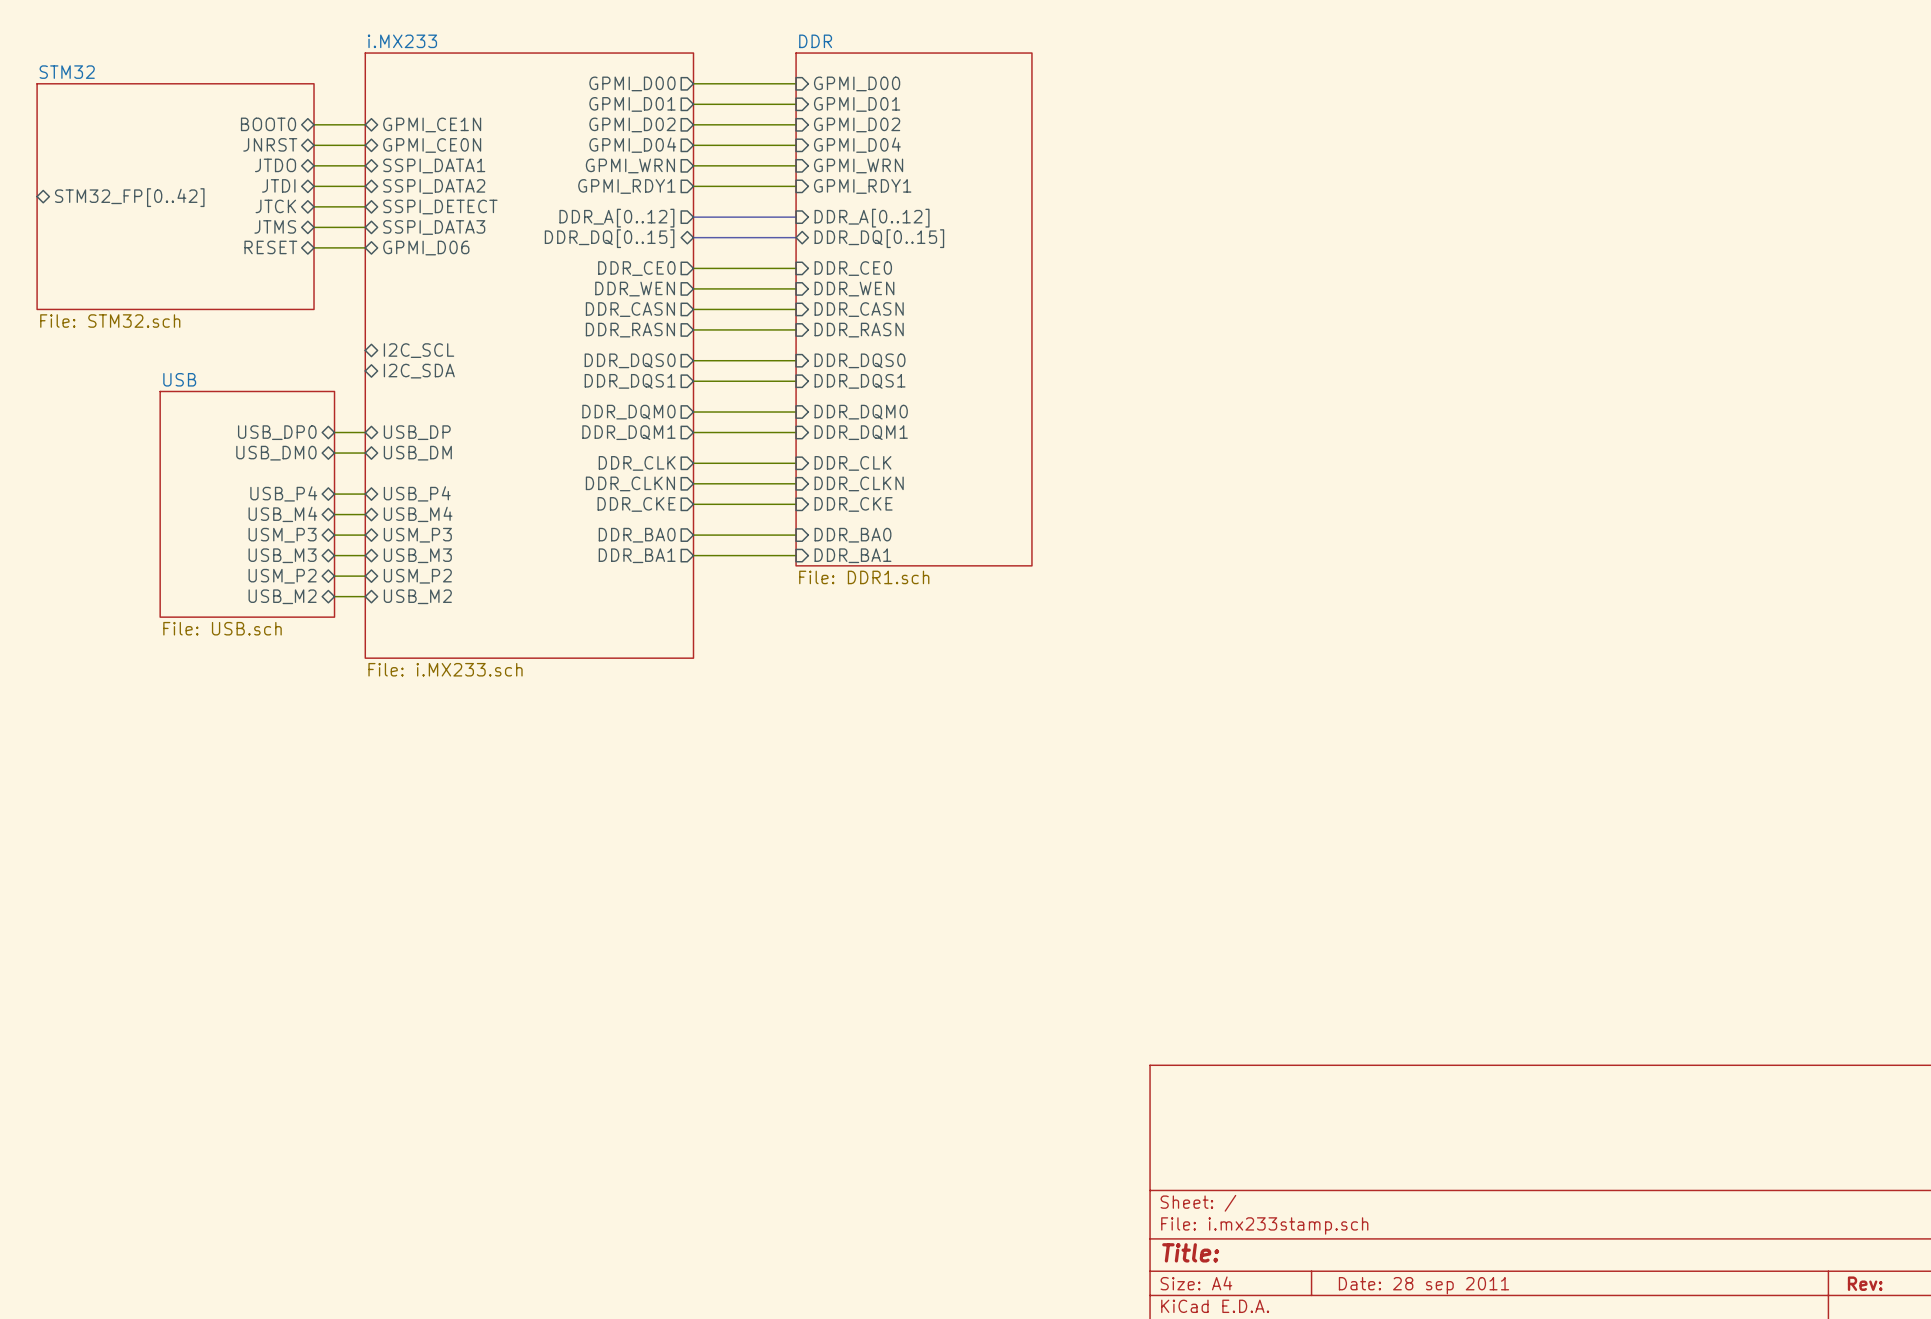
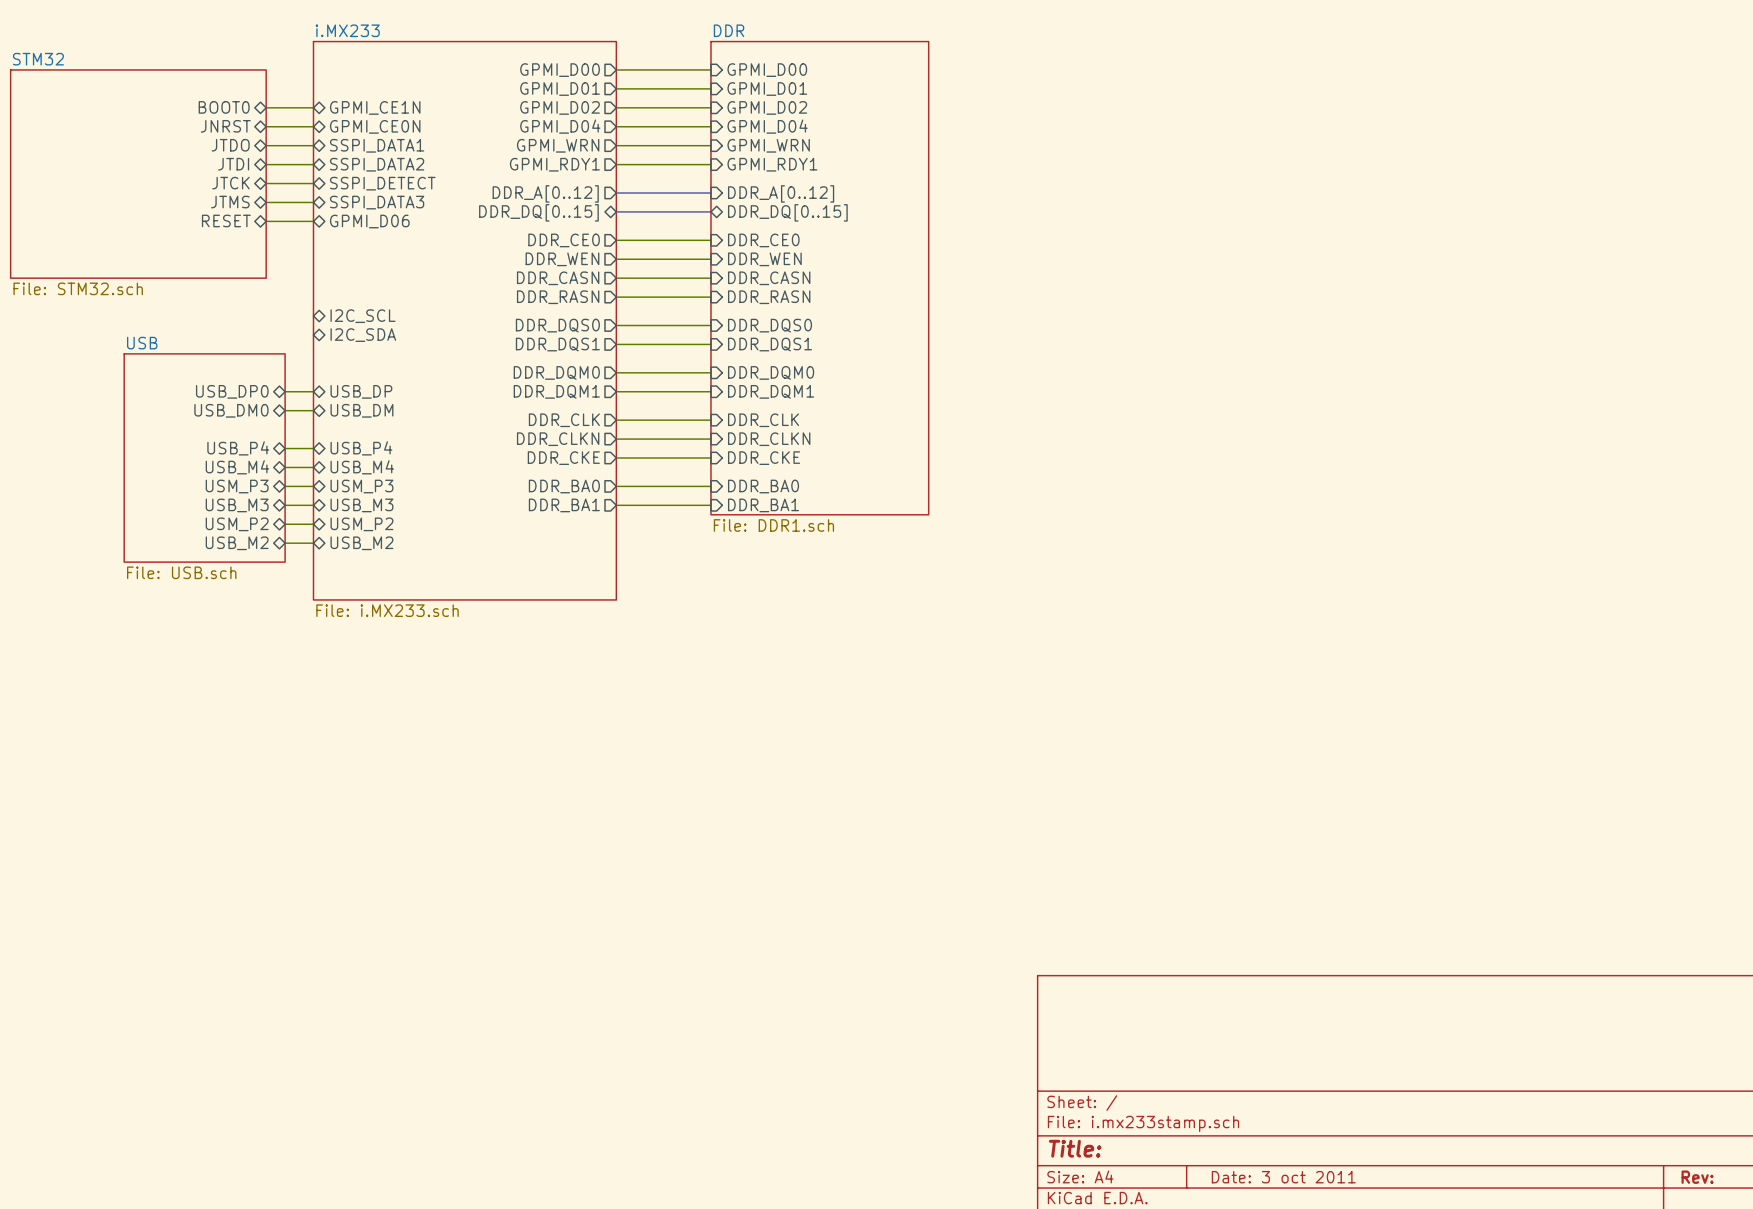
sheet pin: STM32_FP[0..42] (129, 197) -> none
title block: Date: 28 sep 2011 (1423, 1285) -> Date: 3 oct 2011 (1283, 1177)

